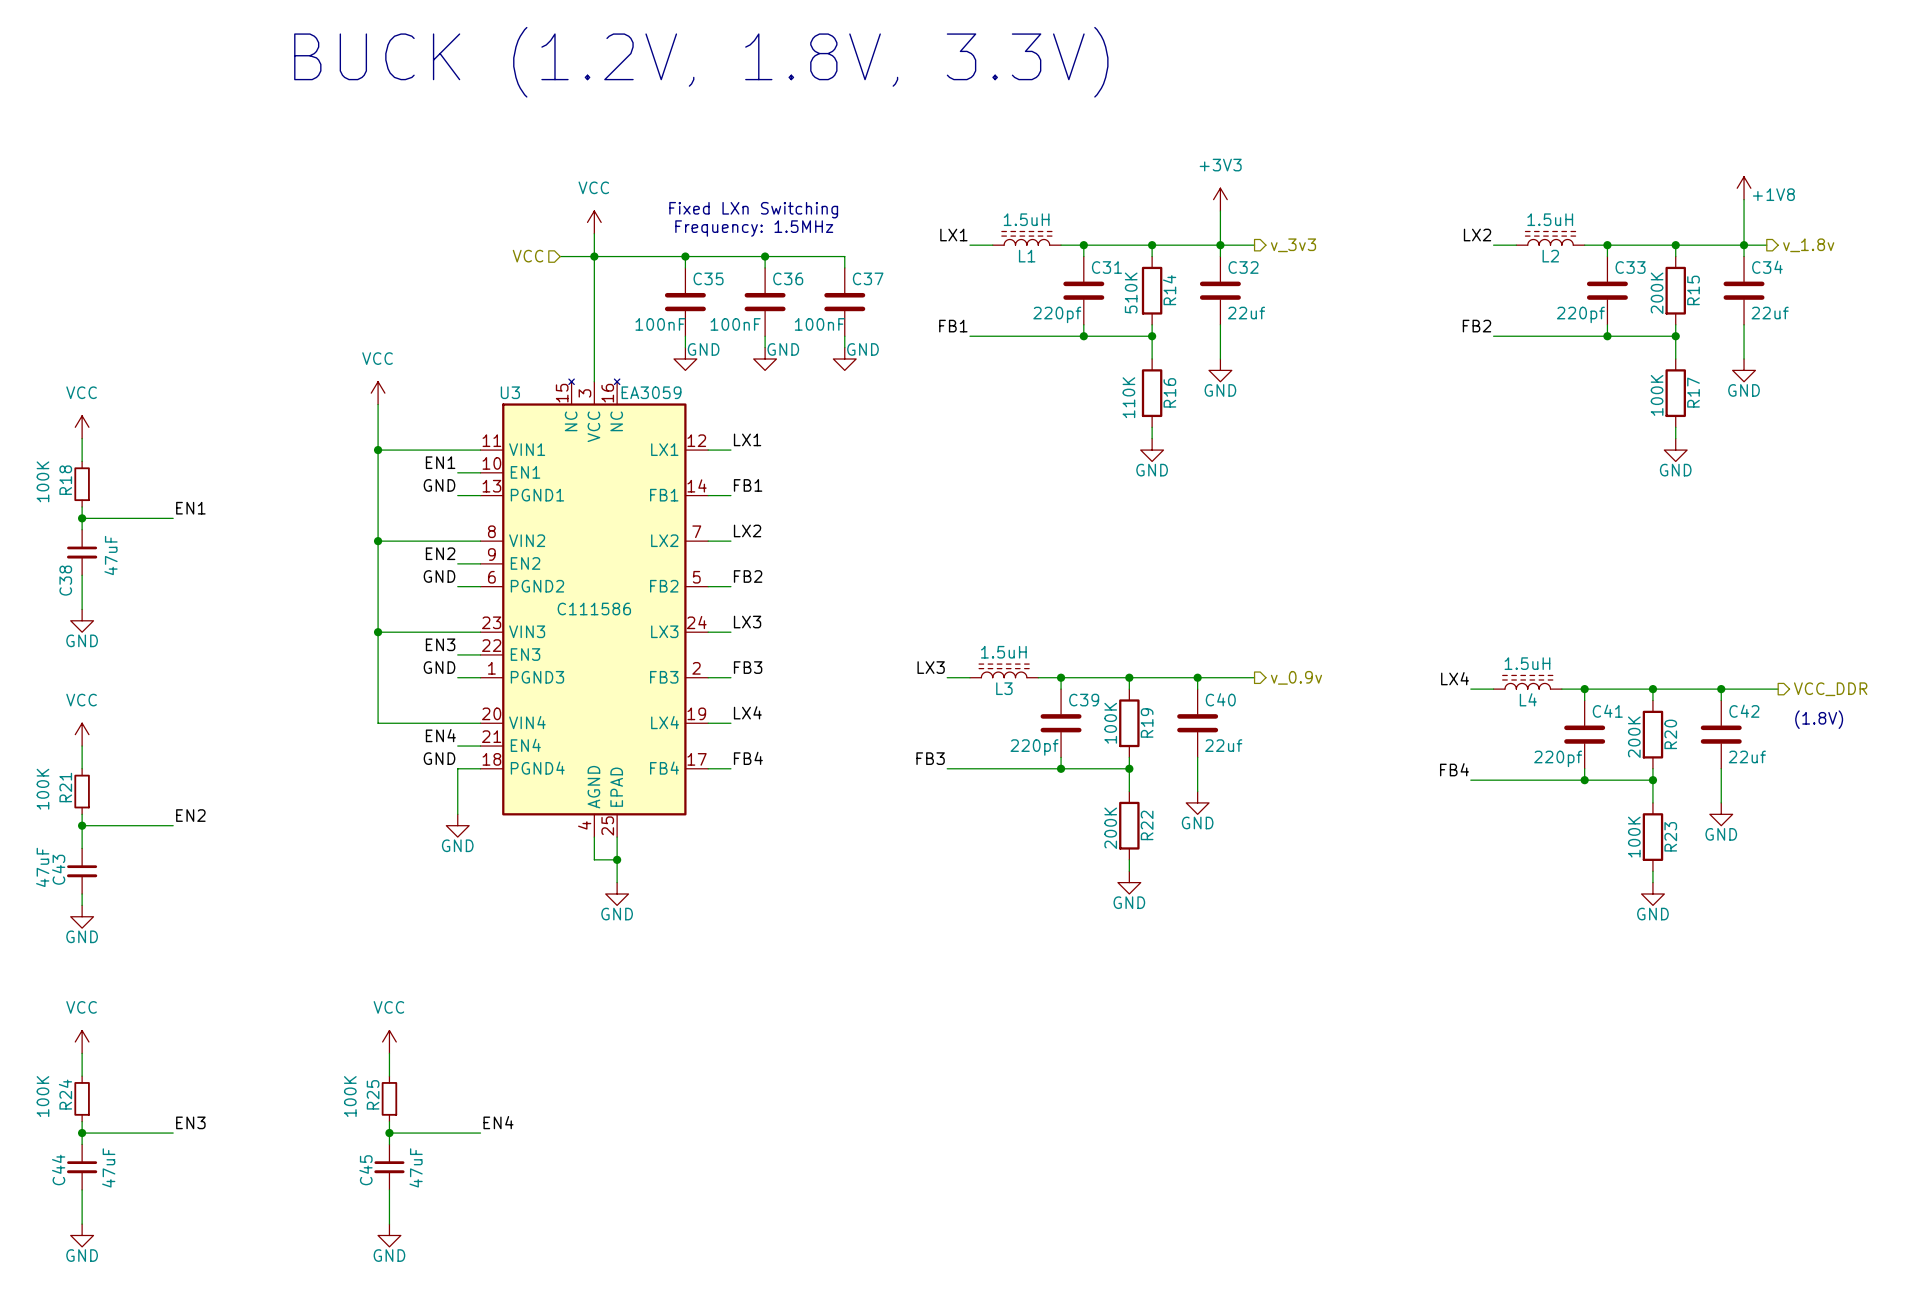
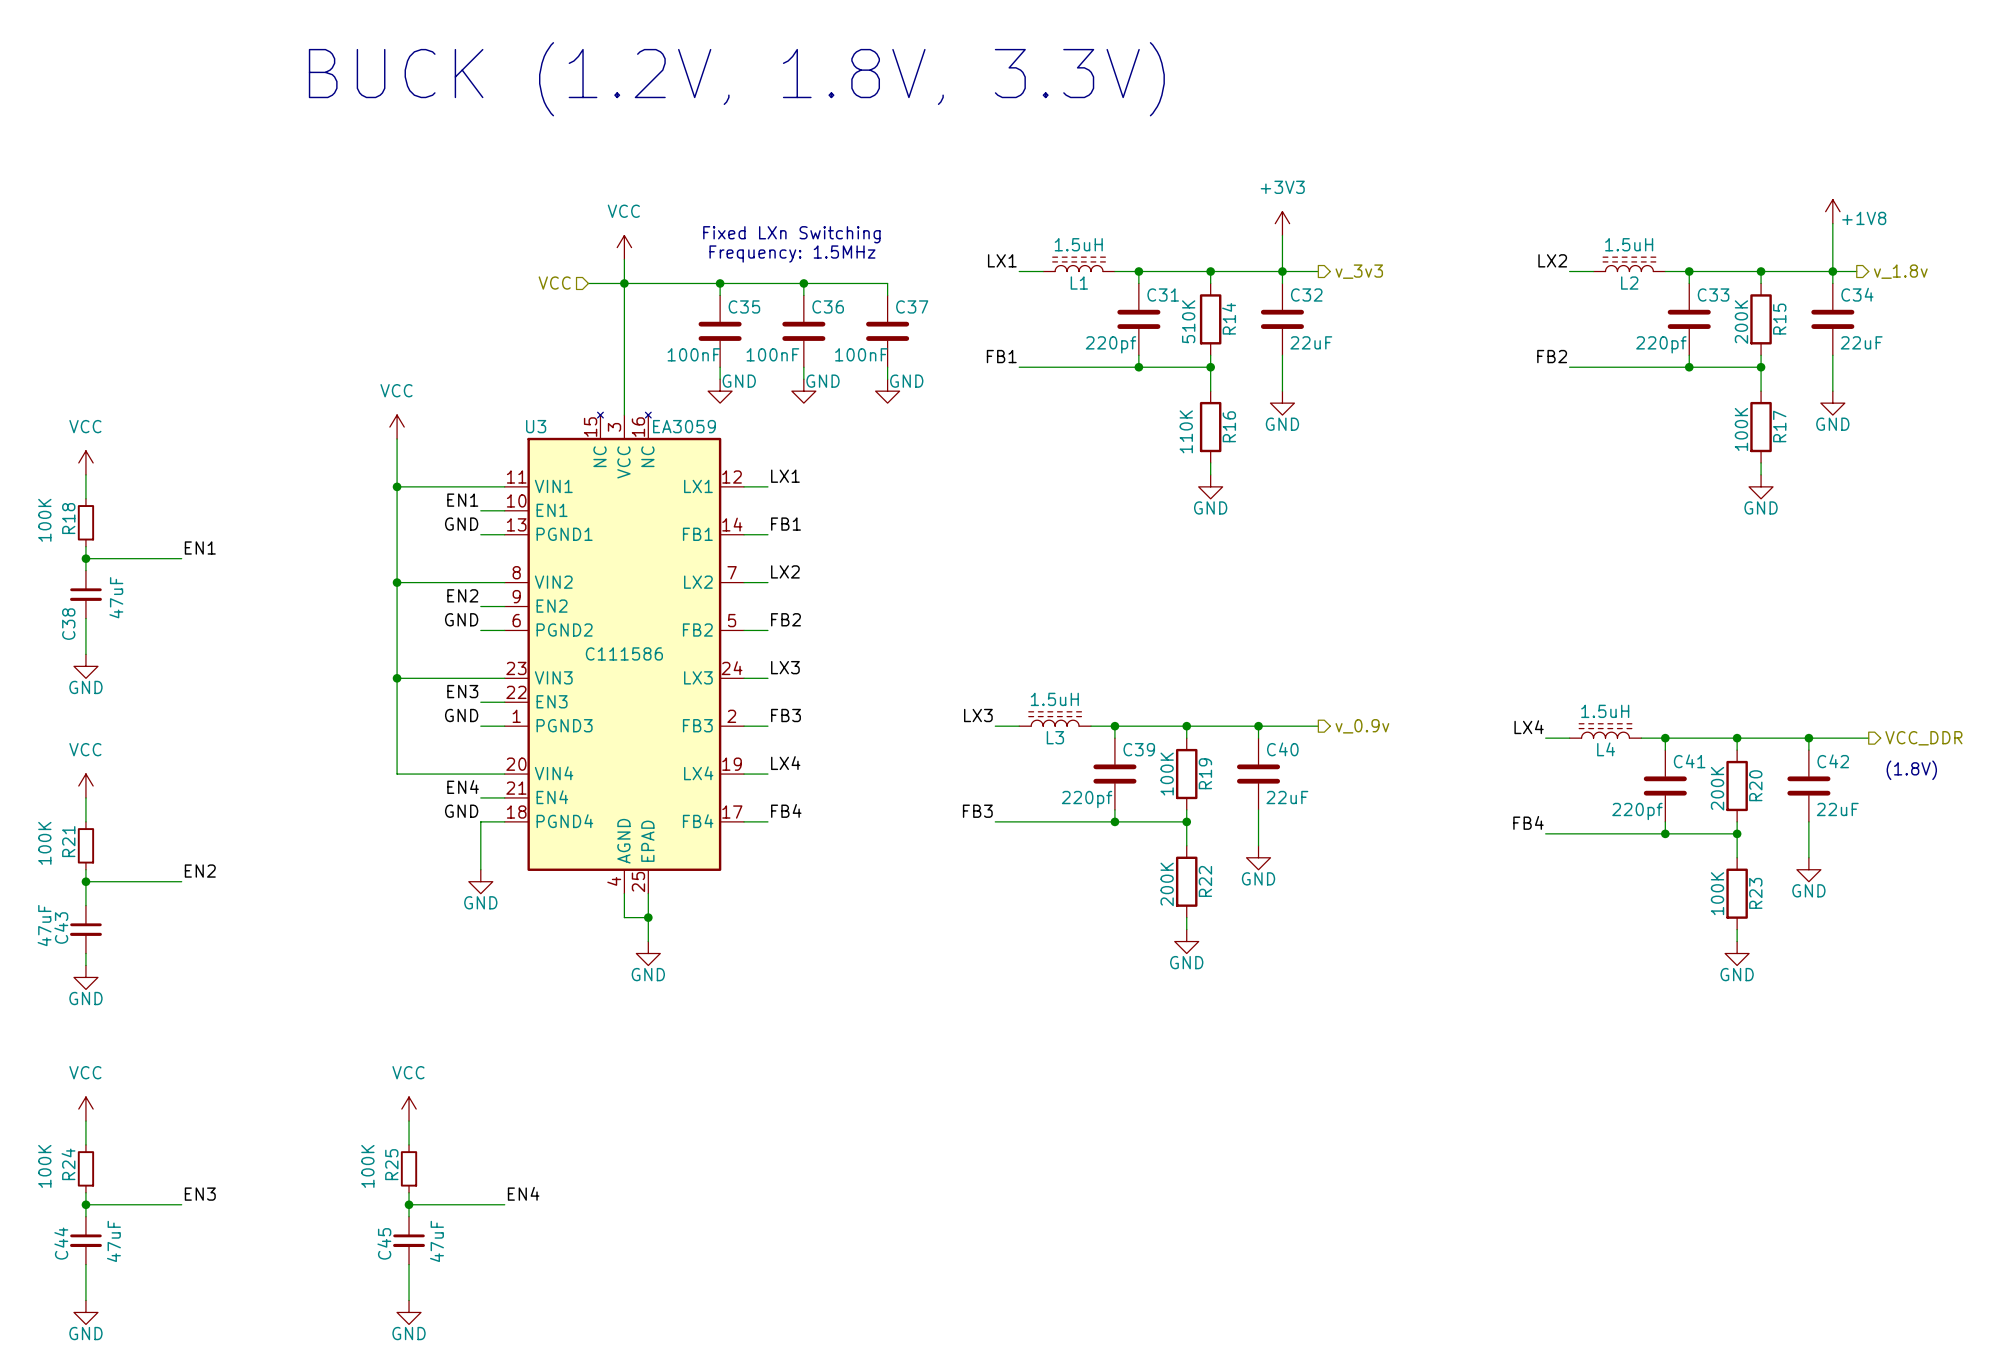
C32 value: 22uf (1246, 313) -> 22uF (1311, 342)
C34 value: 22uf (1770, 313) -> 22uF (1861, 342)
C40 value: 22uf (1223, 745) -> 22uF (1287, 797)
C42 value: 22uf (1747, 756) -> 22uF (1837, 809)

